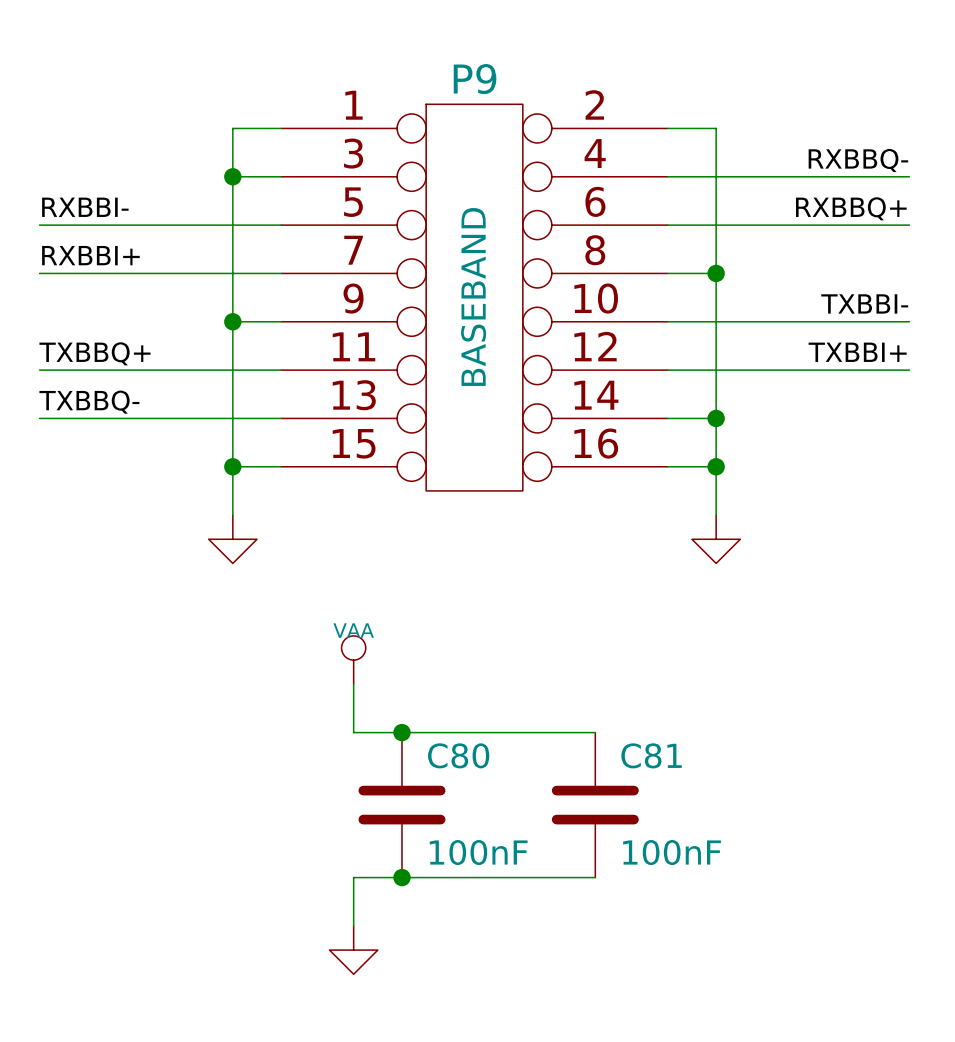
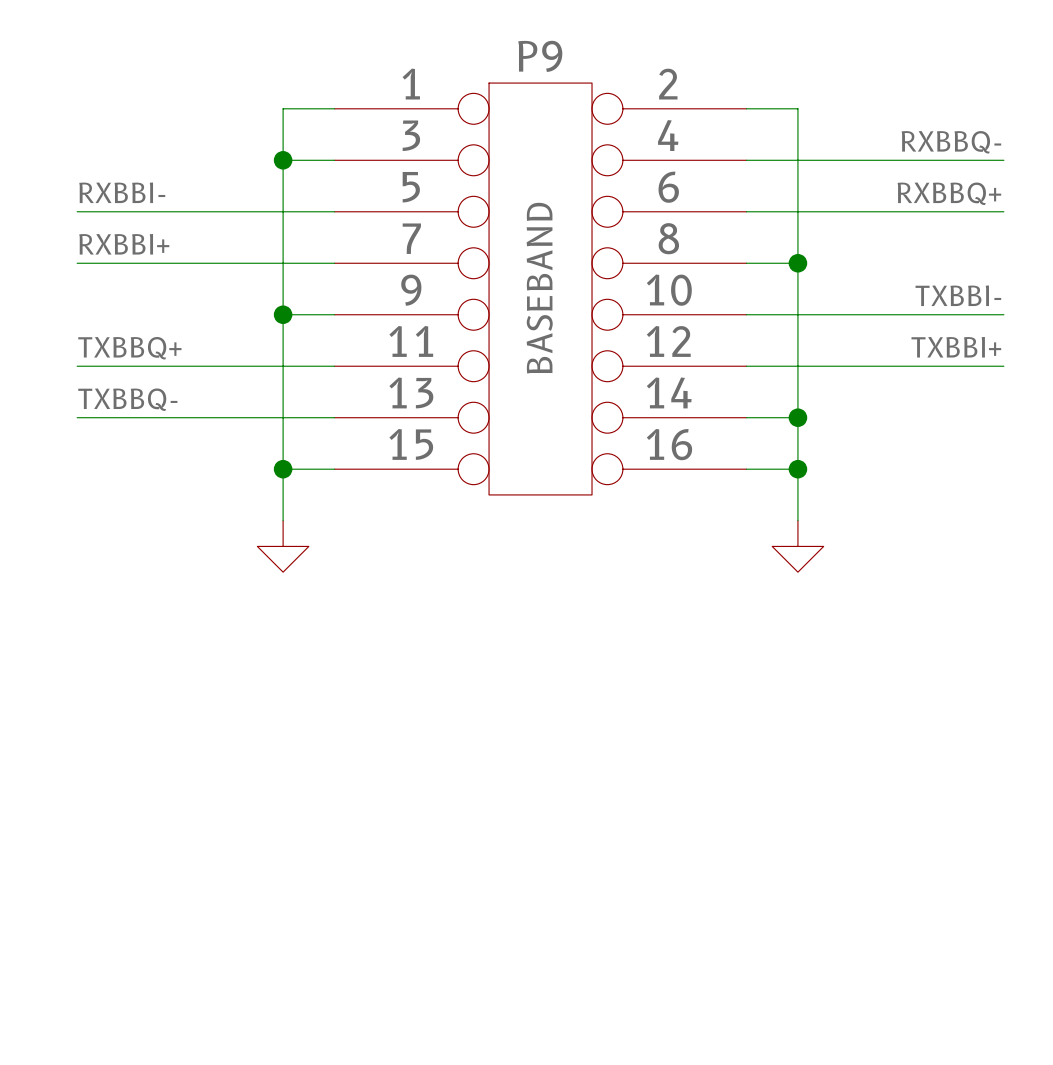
power symbol: VAA (353, 660) -> none
wire: (353, 684) (353, 732) (595, 732) -> none
junction: (401, 732) -> none
C80: 100nF (401, 805) -> none
C81: 100nF (595, 805) -> none
junction: (401, 877) -> none
wire: (595, 877) (353, 877) (353, 925) -> none
power symbol: (353, 950) -> none

